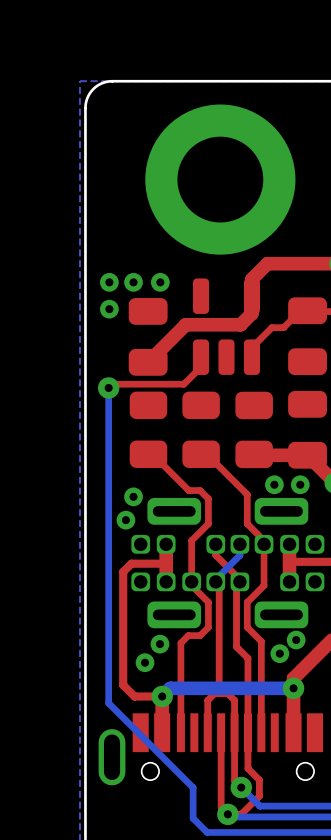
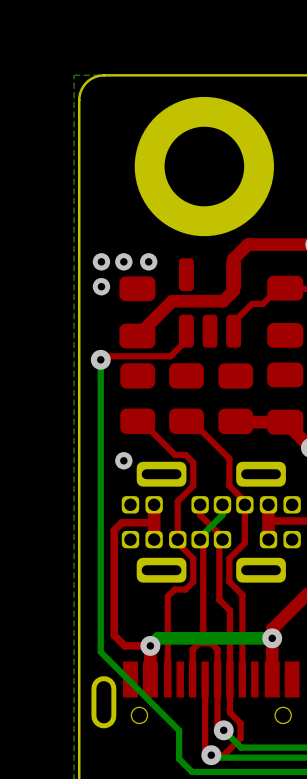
via: (274, 484) -> none
via: (300, 484) -> none
via: (125, 520) -> none
via: (296, 640) -> none
via: (159, 644) -> none
via: (279, 653) -> none
via: (145, 662) -> none

